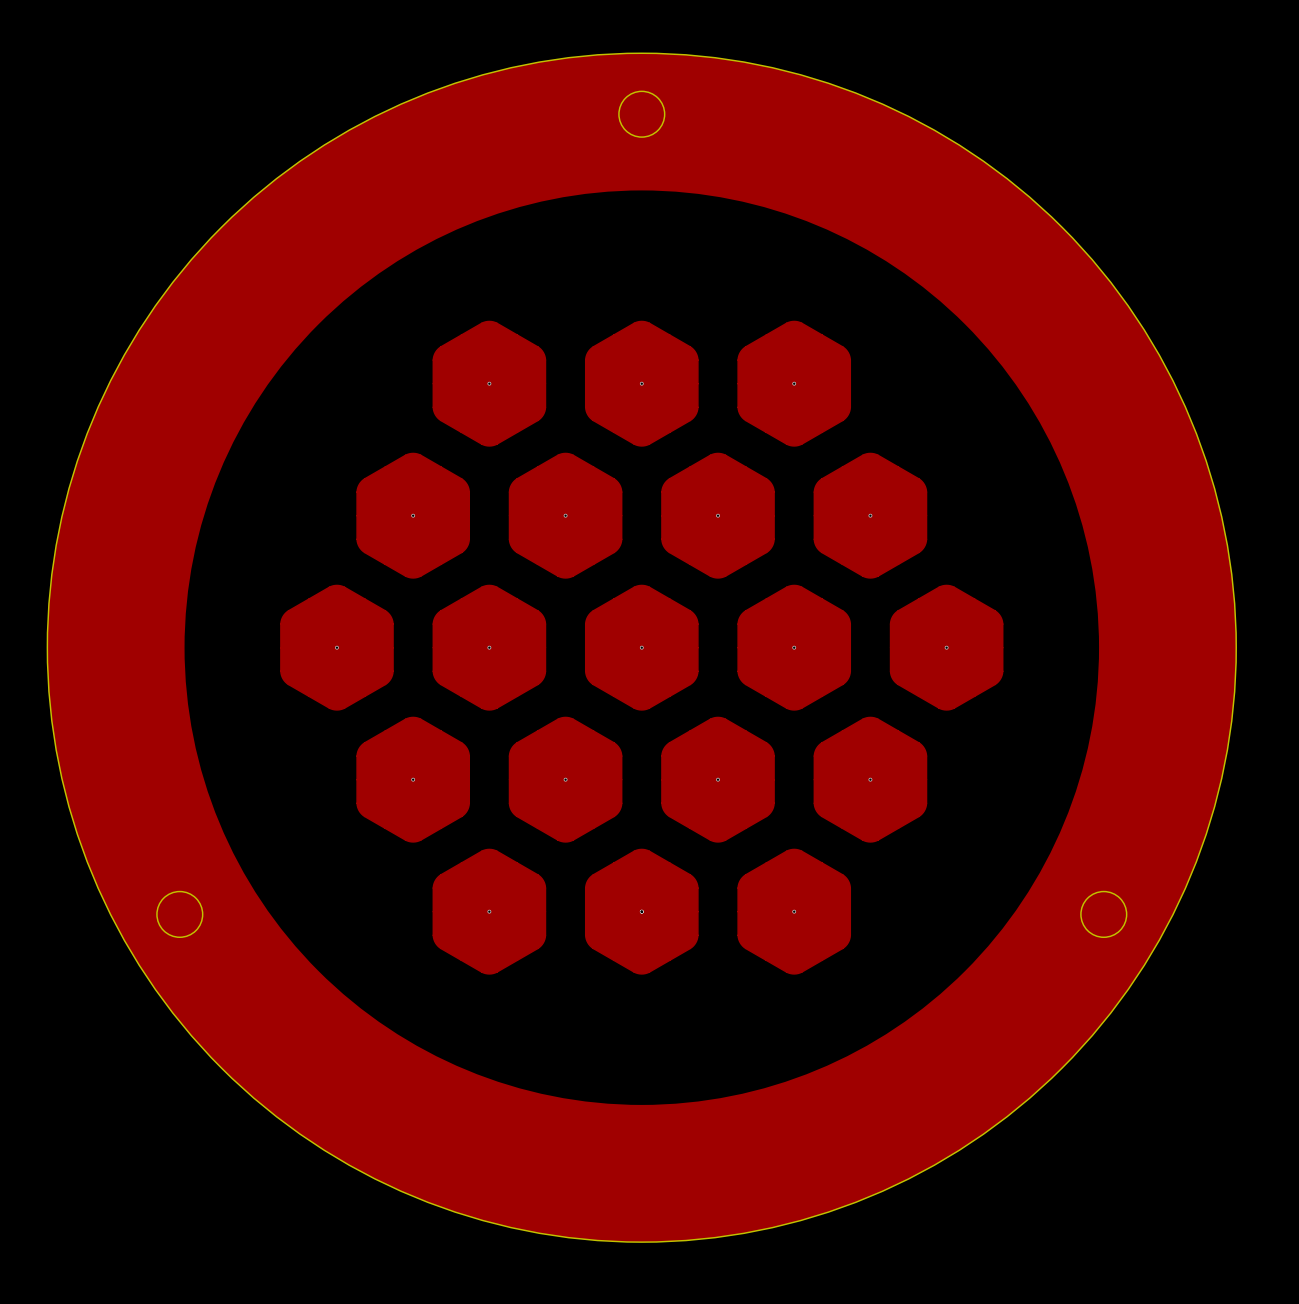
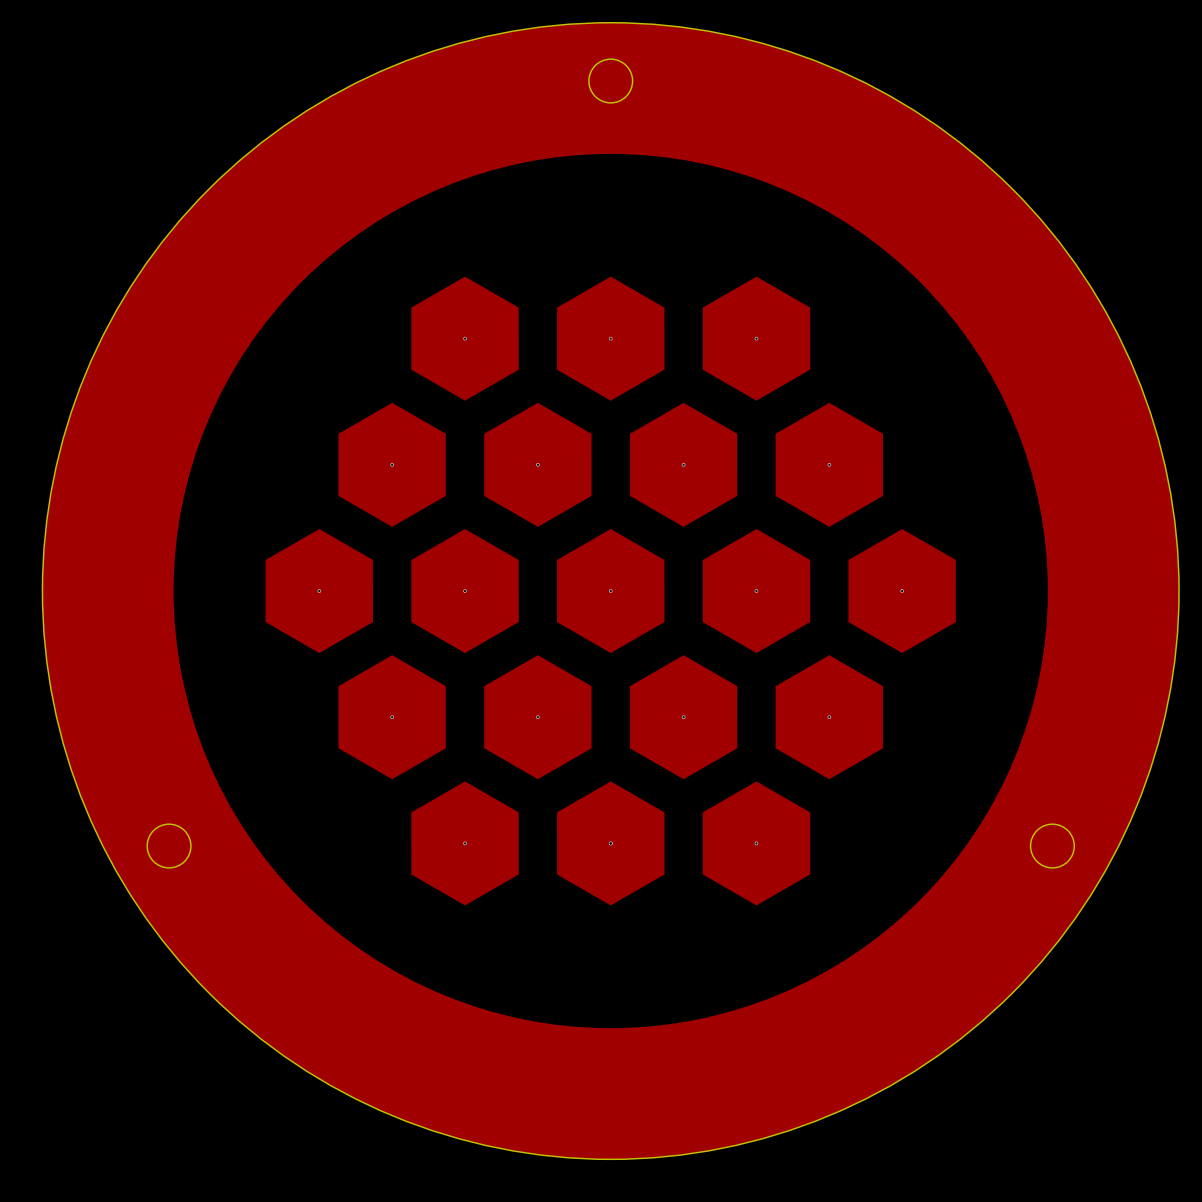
drawing shape: [433, 321, 546, 447] -> [411, 276, 519, 401]
drawing shape: [585, 321, 698, 447] -> [557, 276, 665, 401]
drawing shape: [738, 321, 851, 447] -> [702, 276, 811, 401]
drawing shape: [357, 453, 470, 579] -> [338, 402, 446, 527]
drawing shape: [509, 453, 622, 579] -> [484, 402, 592, 527]
drawing shape: [661, 453, 775, 579] -> [629, 402, 738, 527]
drawing shape: [814, 453, 927, 579] -> [775, 402, 884, 527]
drawing shape: [280, 585, 394, 710] -> [265, 529, 374, 654]
drawing shape: [433, 585, 546, 710] -> [411, 529, 519, 654]
drawing shape: [585, 585, 698, 710] -> [557, 529, 665, 654]
drawing shape: [738, 585, 851, 710] -> [702, 529, 811, 654]
drawing shape: [890, 585, 1003, 710] -> [848, 529, 956, 654]
drawing shape: [357, 717, 470, 842] -> [338, 655, 446, 780]
drawing shape: [509, 717, 622, 842] -> [484, 655, 592, 780]
drawing shape: [661, 717, 775, 842] -> [629, 655, 738, 780]
drawing shape: [814, 717, 927, 842] -> [775, 655, 884, 780]
drawing shape: [433, 849, 546, 974] -> [411, 781, 519, 906]
drawing shape: [585, 849, 698, 974] -> [557, 781, 665, 906]
drawing shape: [738, 849, 851, 974] -> [702, 781, 811, 906]

